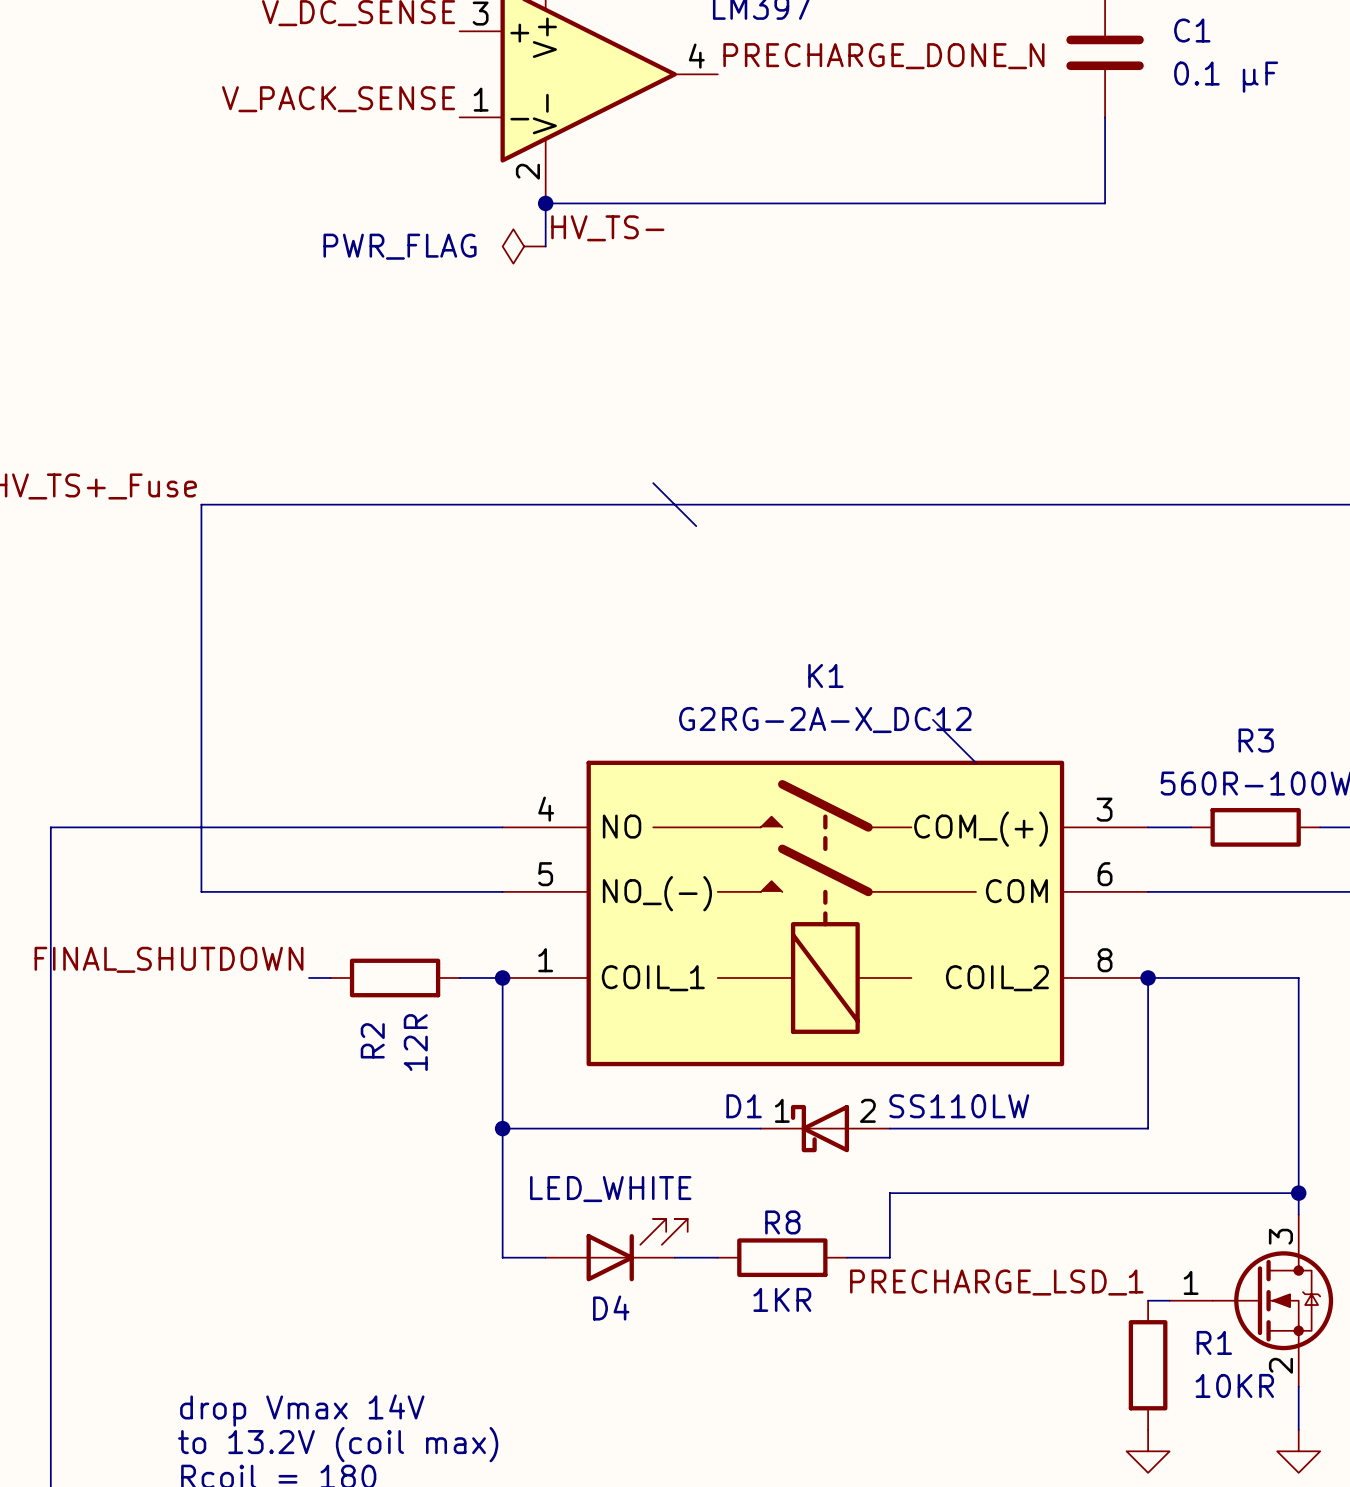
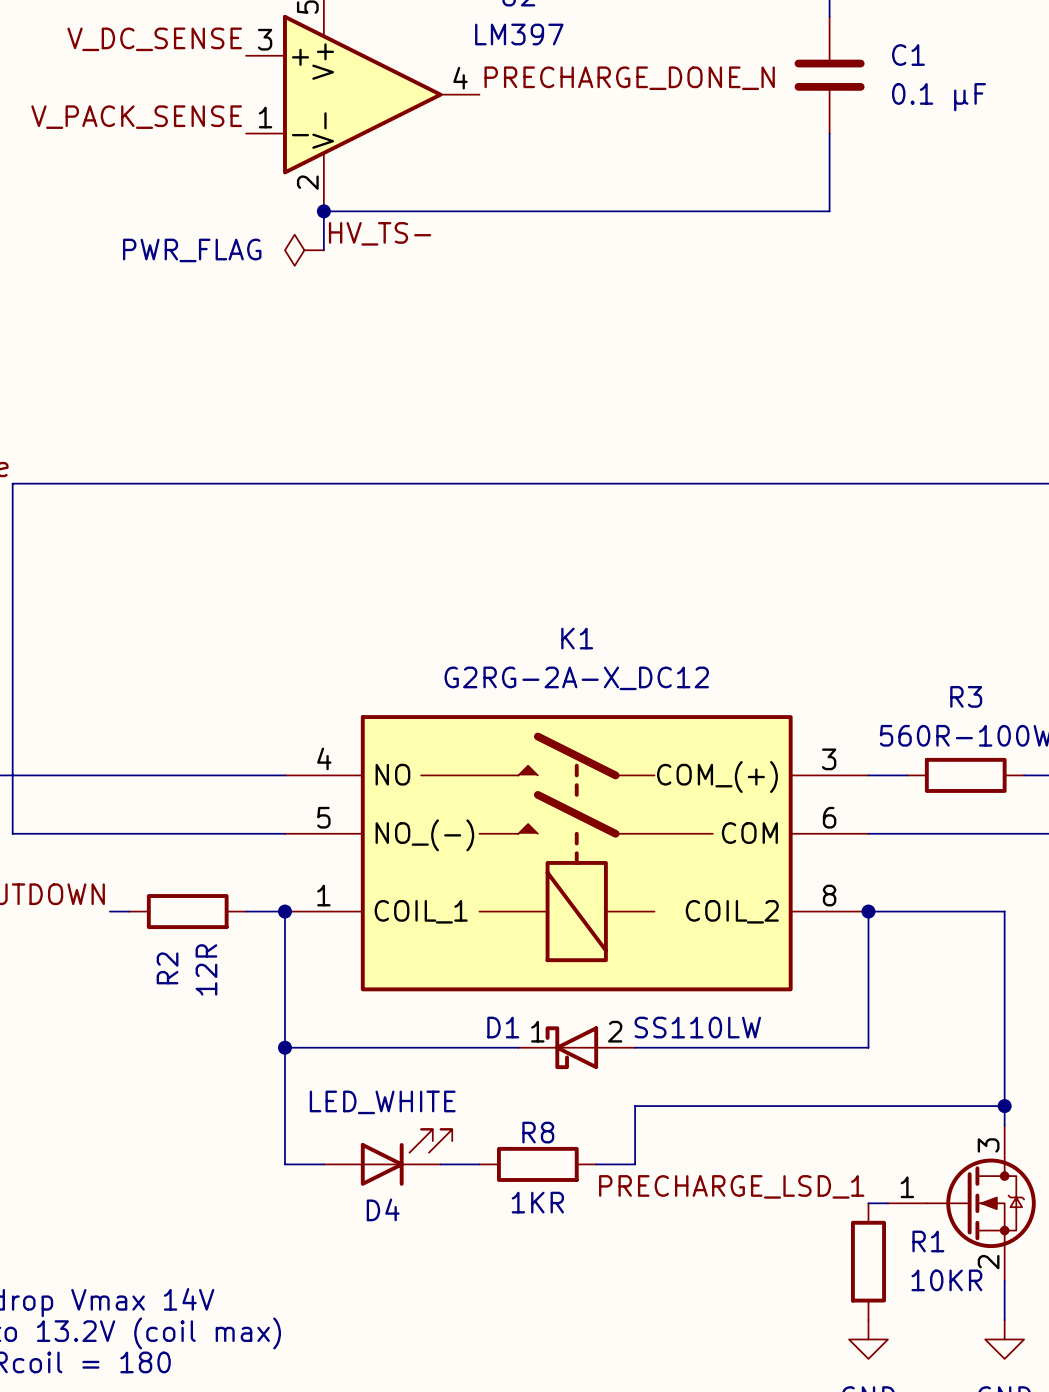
wire: (653, 483) (696, 526) -> none
wire: (932, 719) (975, 762) -> none

